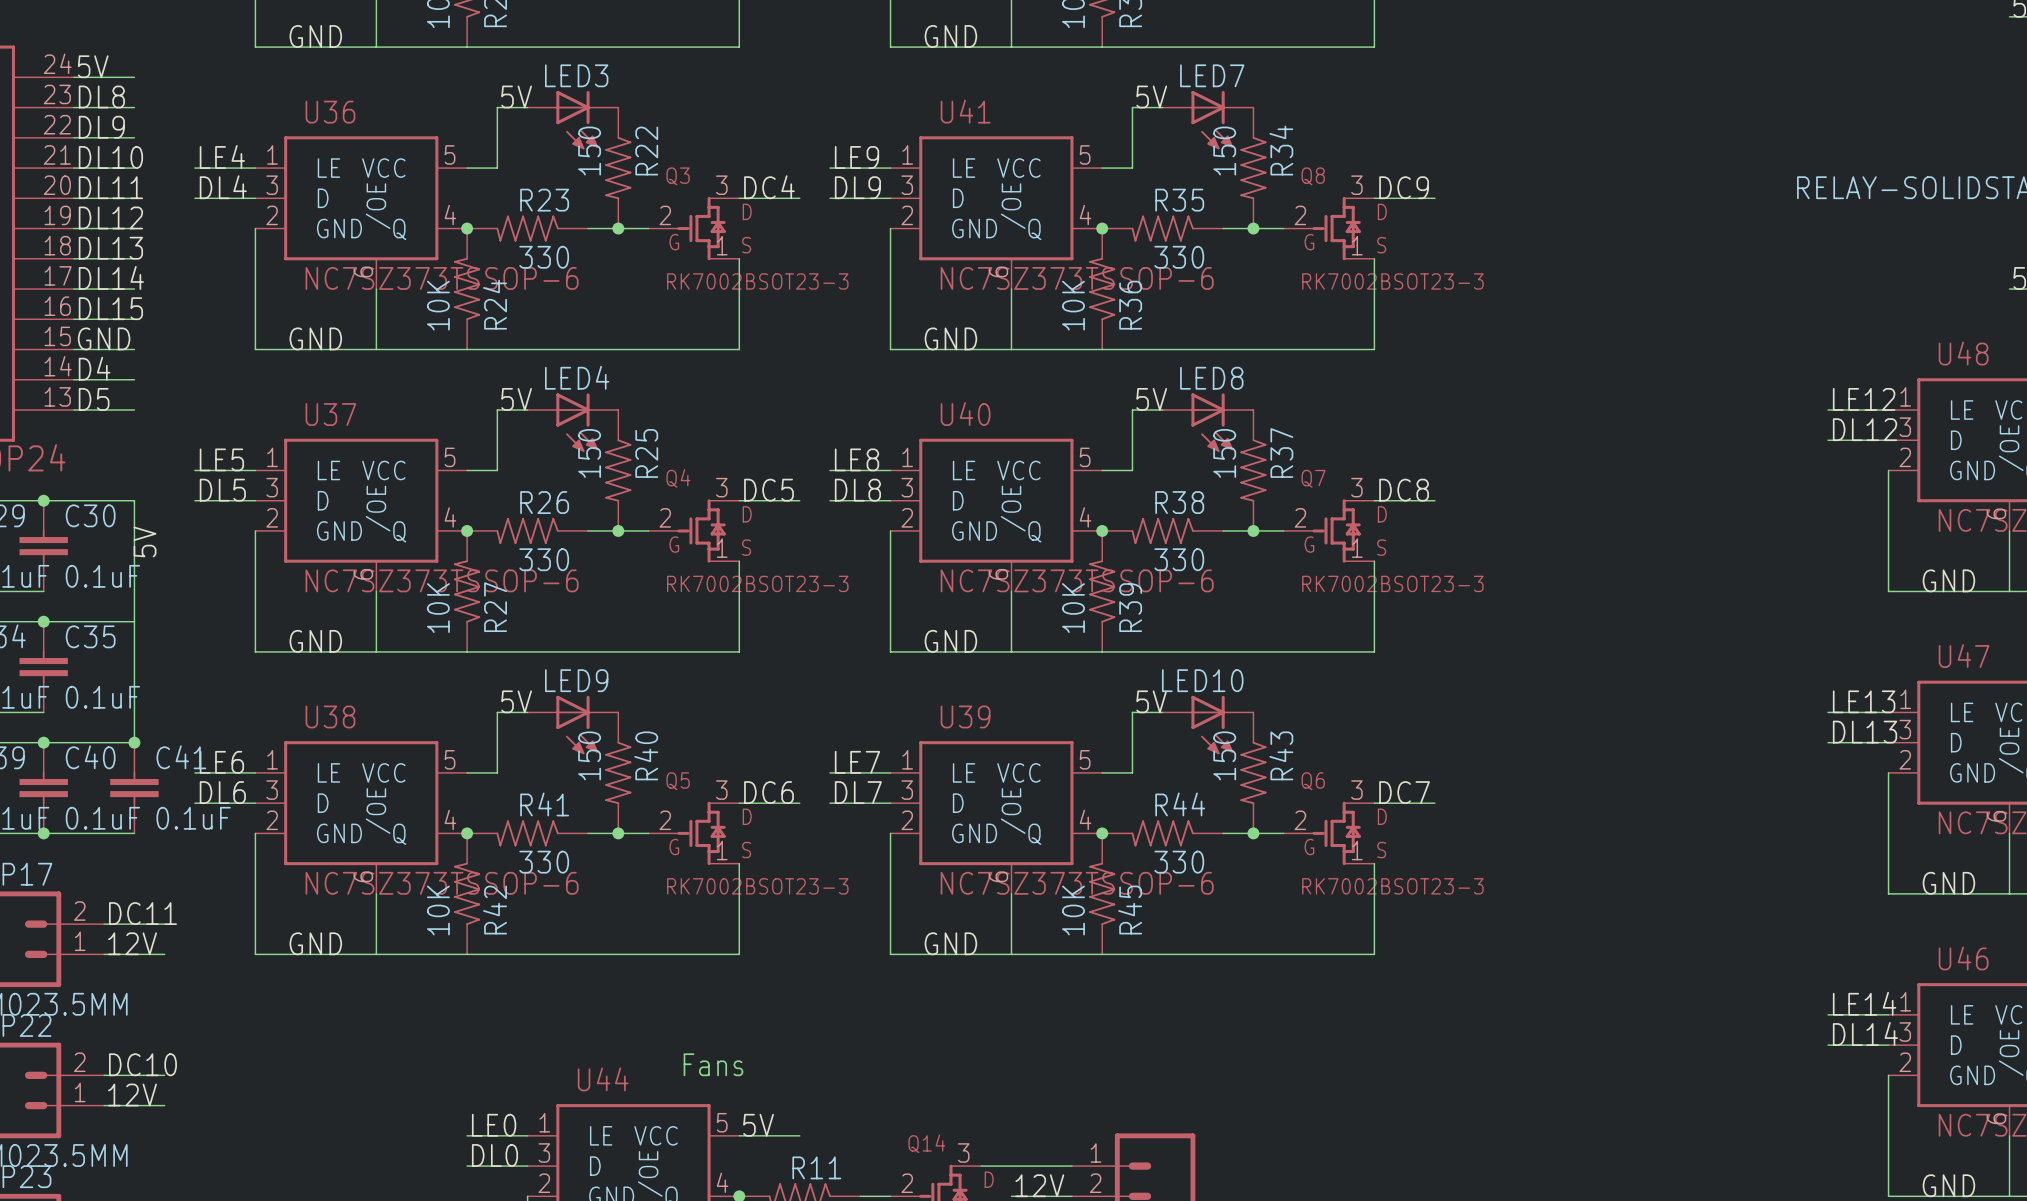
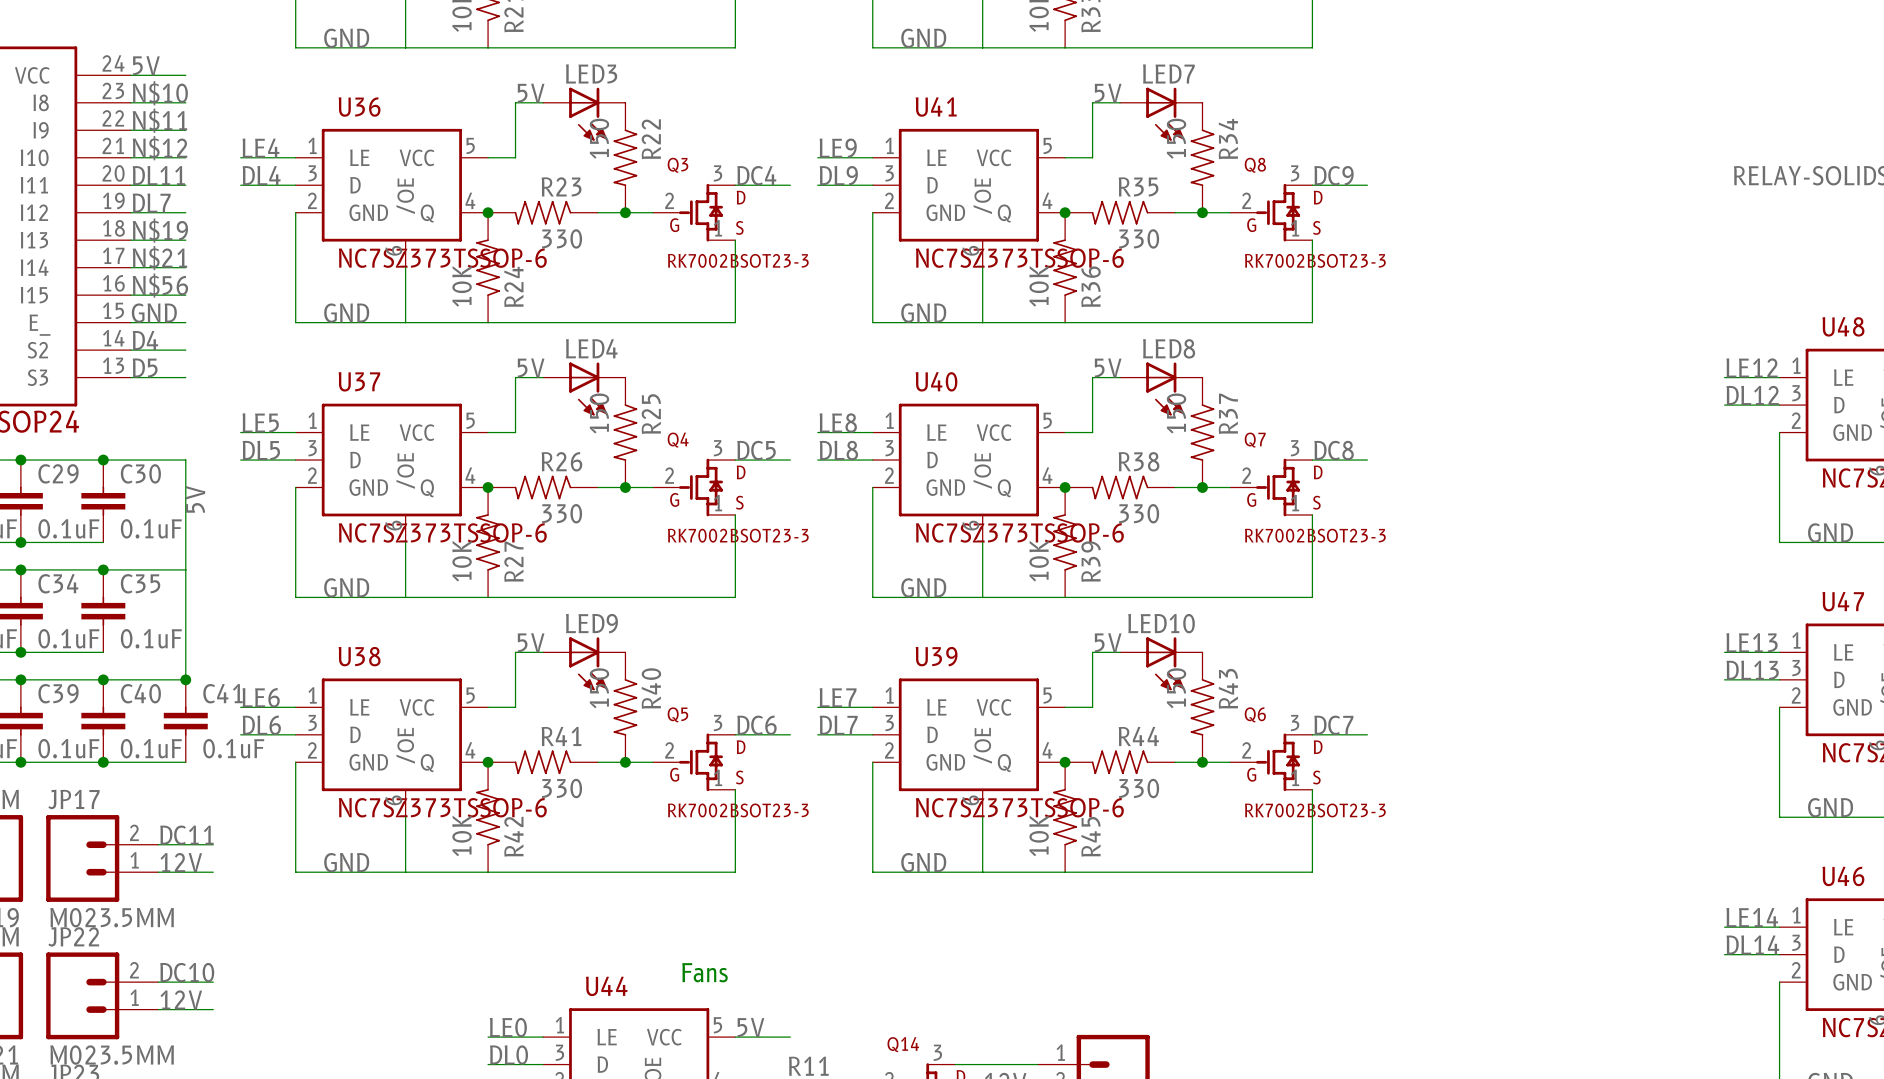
label: DL8 (101, 96) -> N$10 (160, 93)
label: DL9 (101, 127) -> N$11 (159, 120)
label: DL10 (110, 157) -> N$12 (160, 148)
label: DL12 (110, 217) -> DL7 (151, 203)
label: DL13 (110, 248) -> N$19 (160, 230)
label: DL14 (111, 277) -> N$21 (159, 258)
label: DL15 (110, 308) -> N$56 (160, 285)

